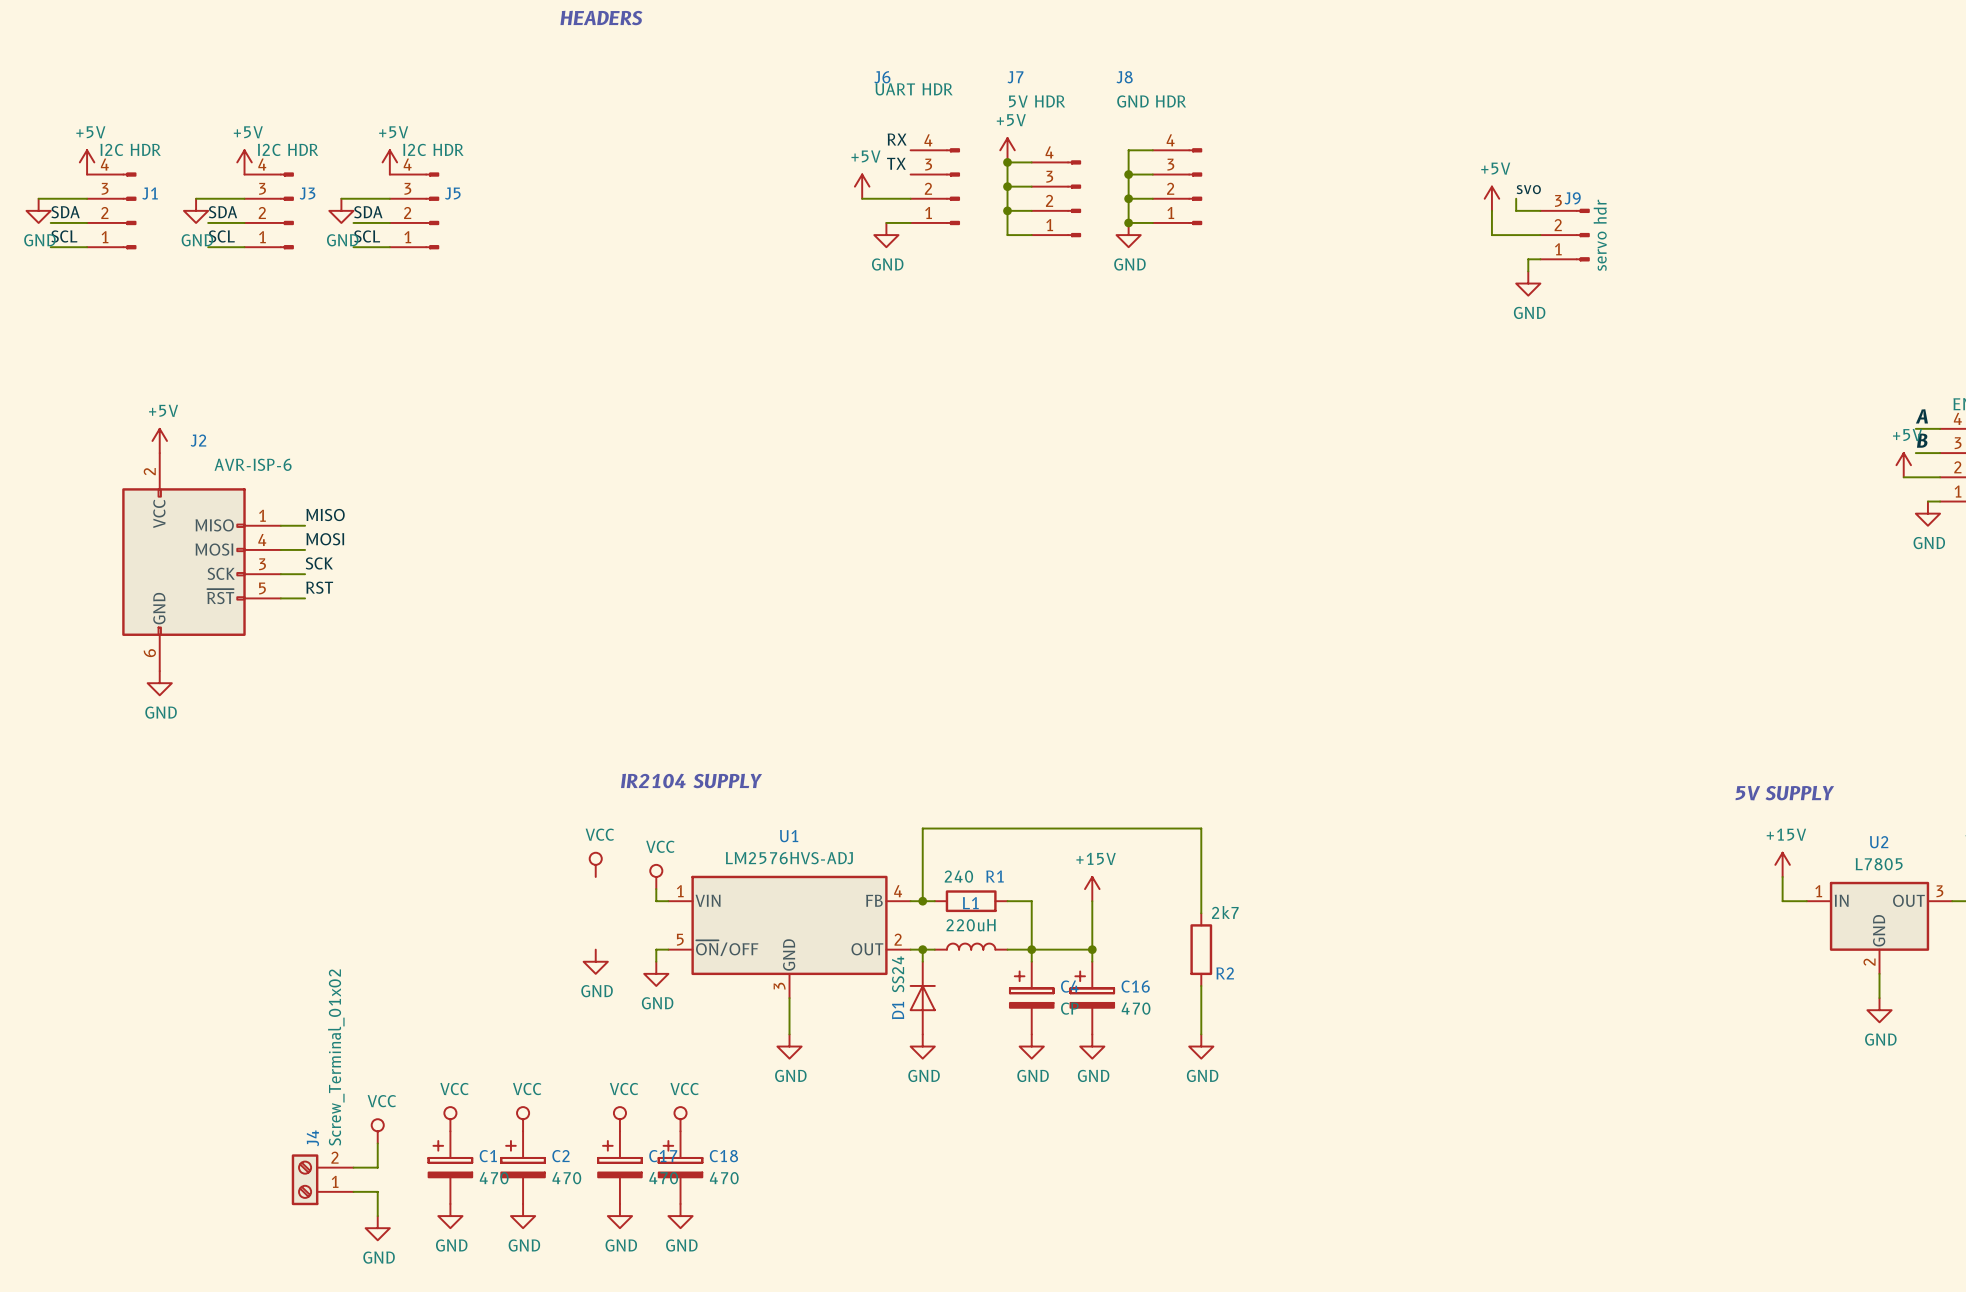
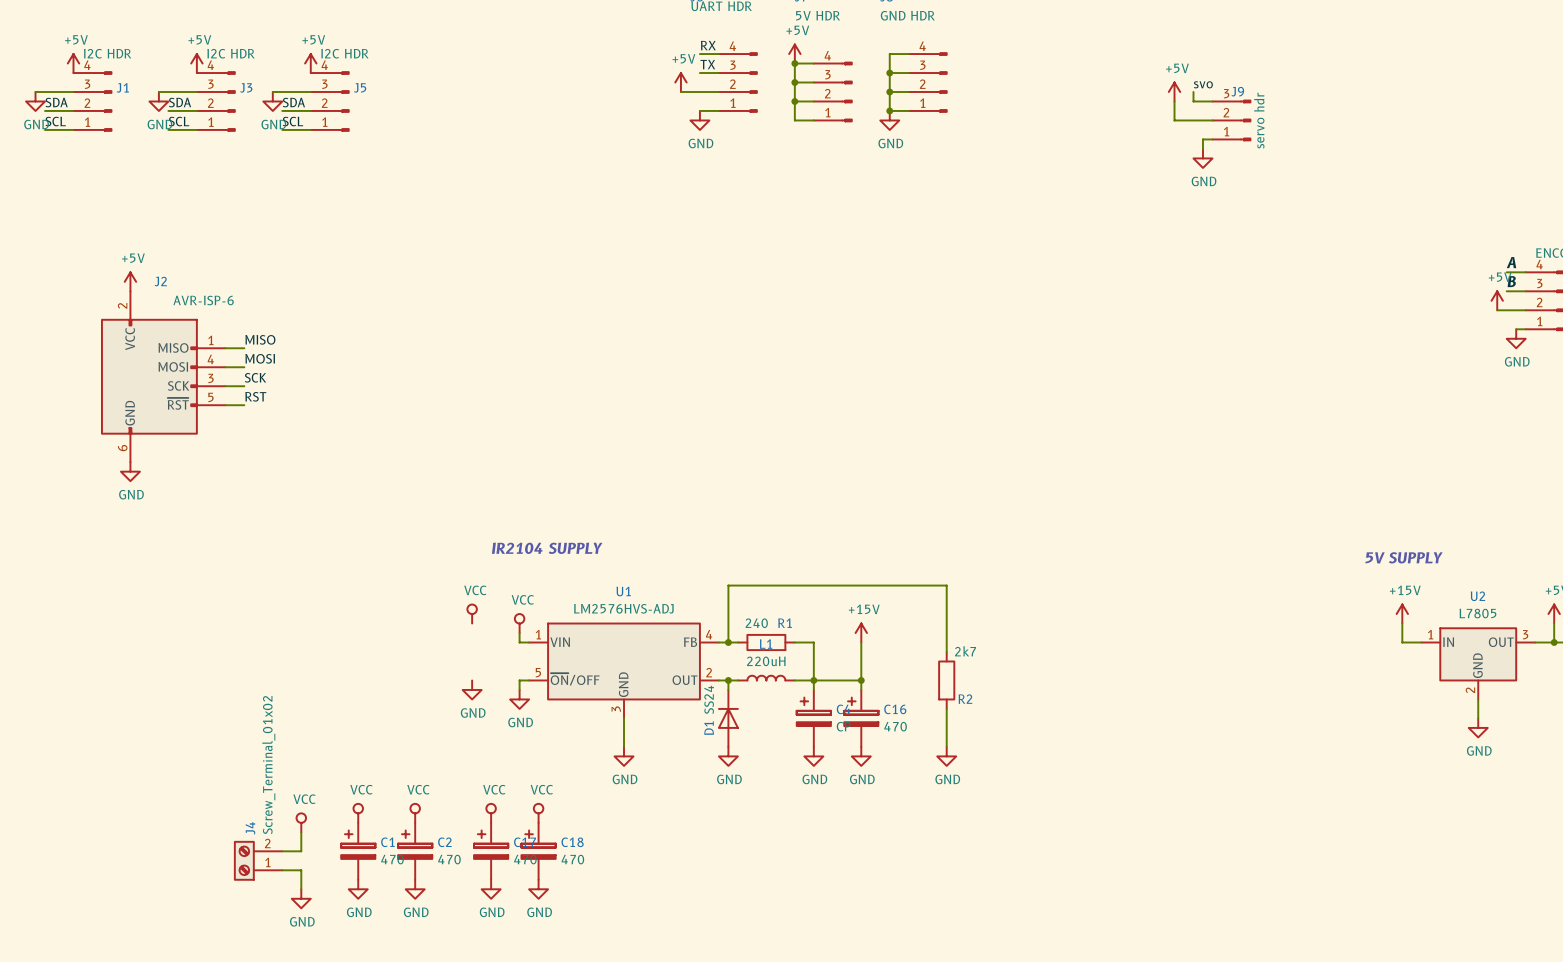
wire: none -> (699, 54) (718, 54)
wire: none -> (699, 73) (718, 73)

